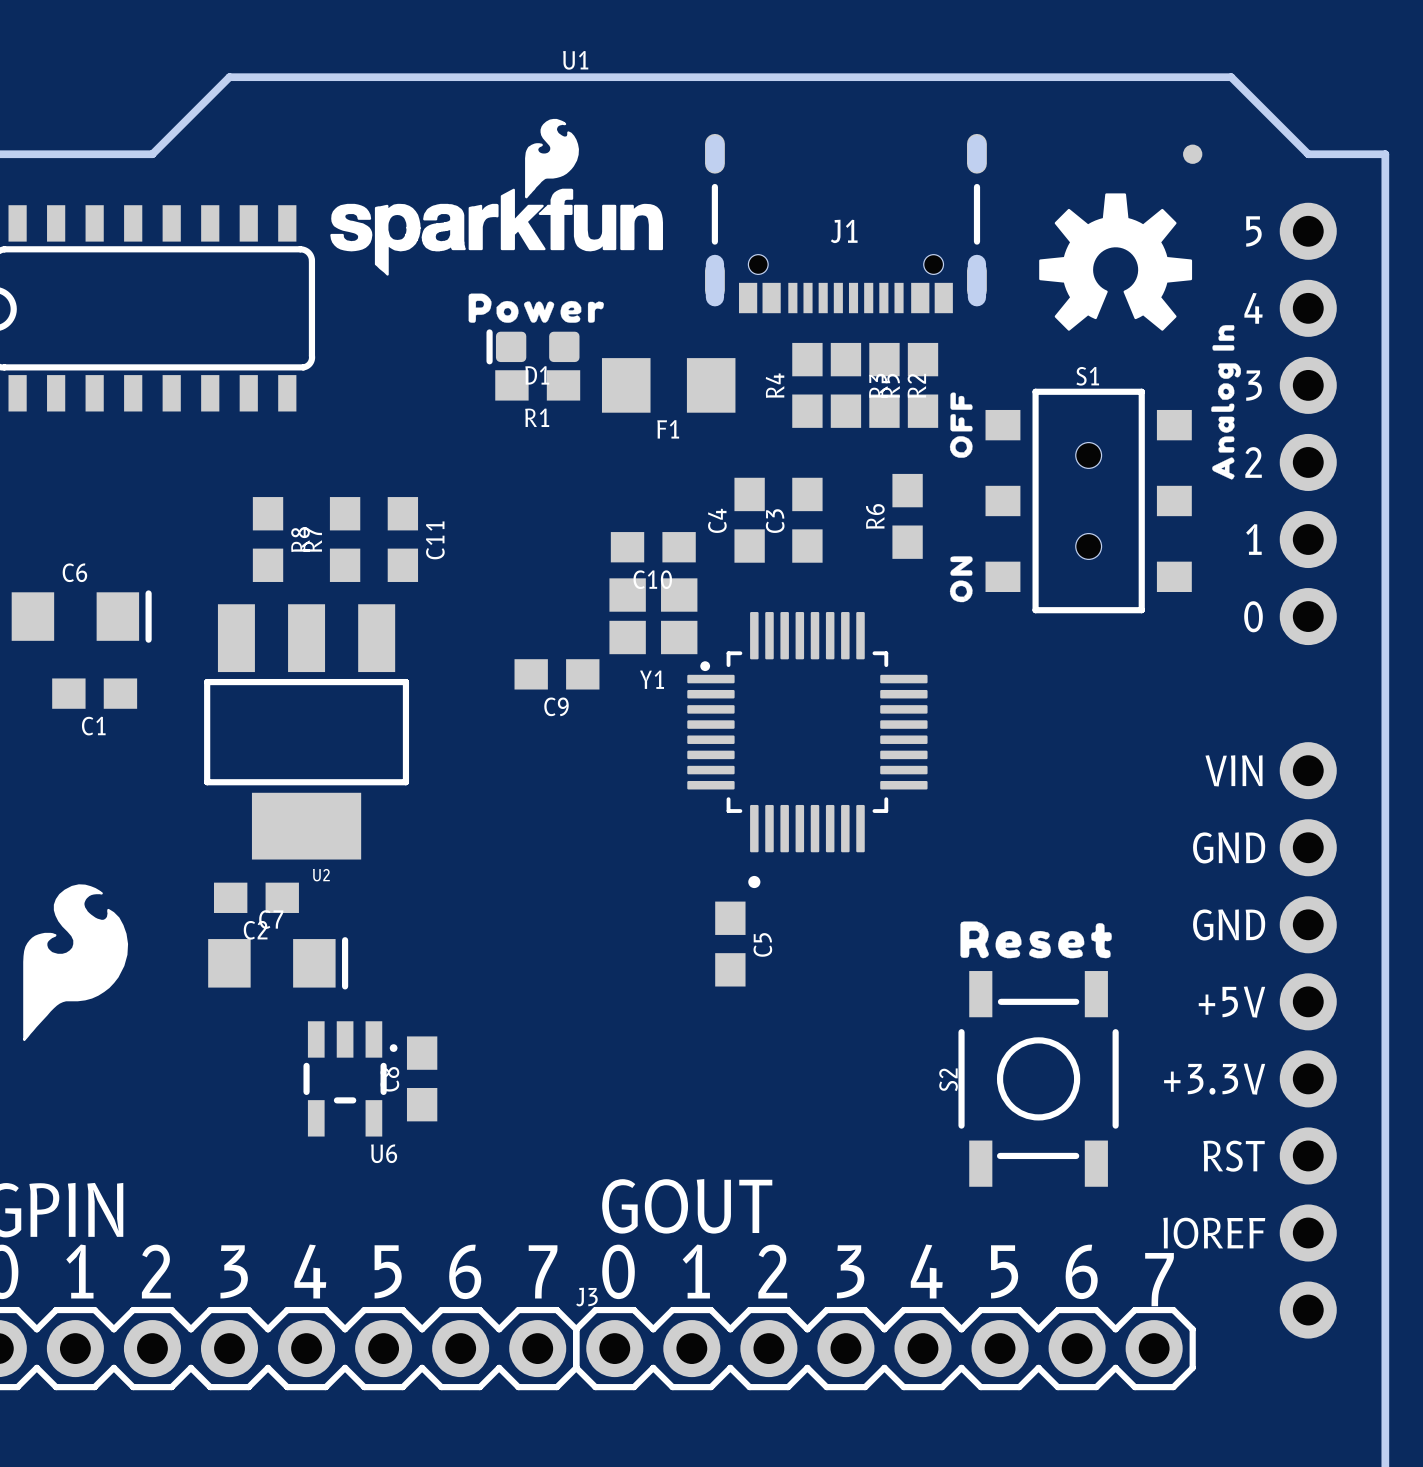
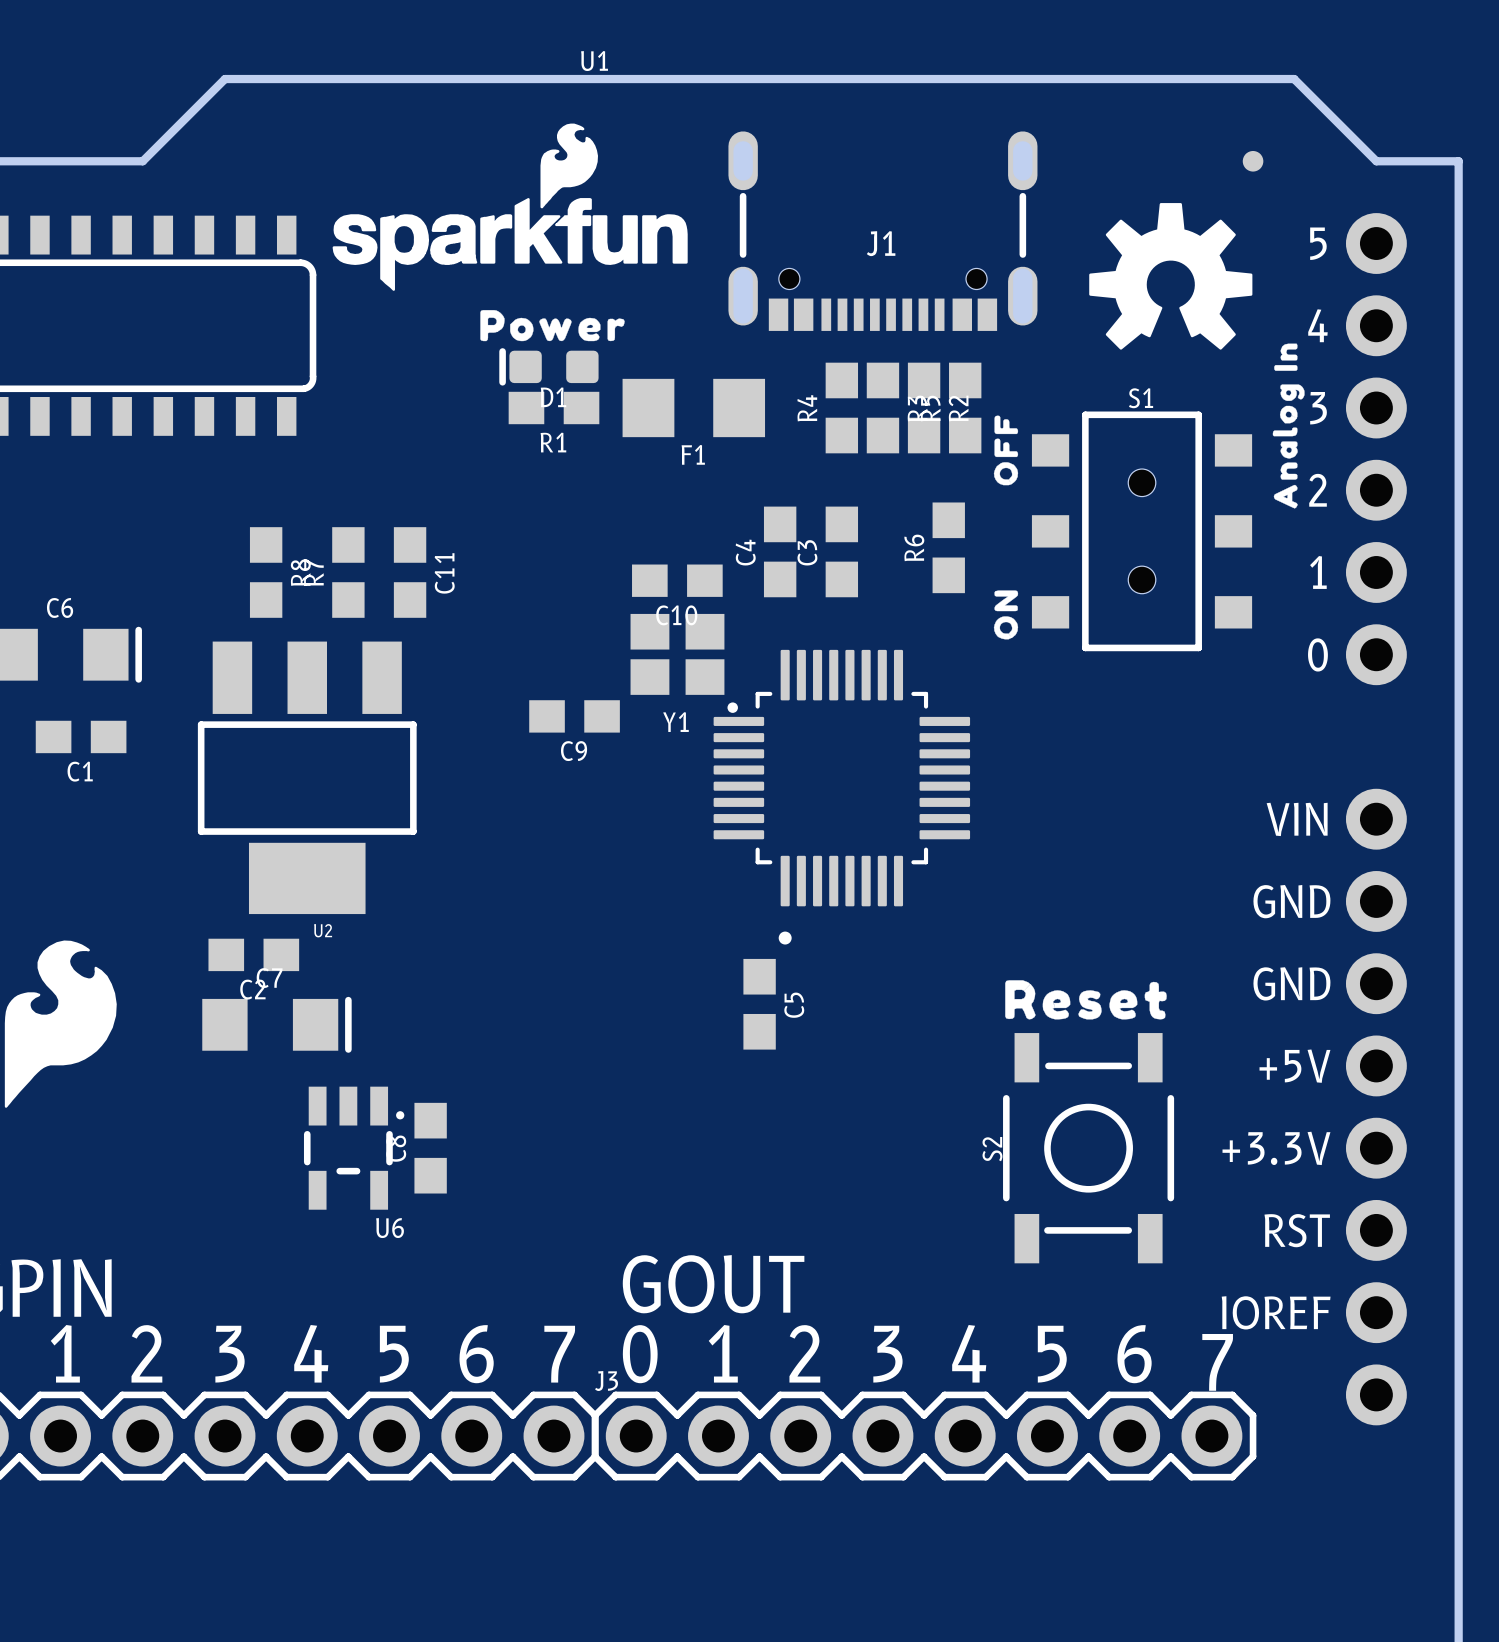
J1 footprint: [705, 133, 987, 314] -> [728, 131, 1038, 331]

